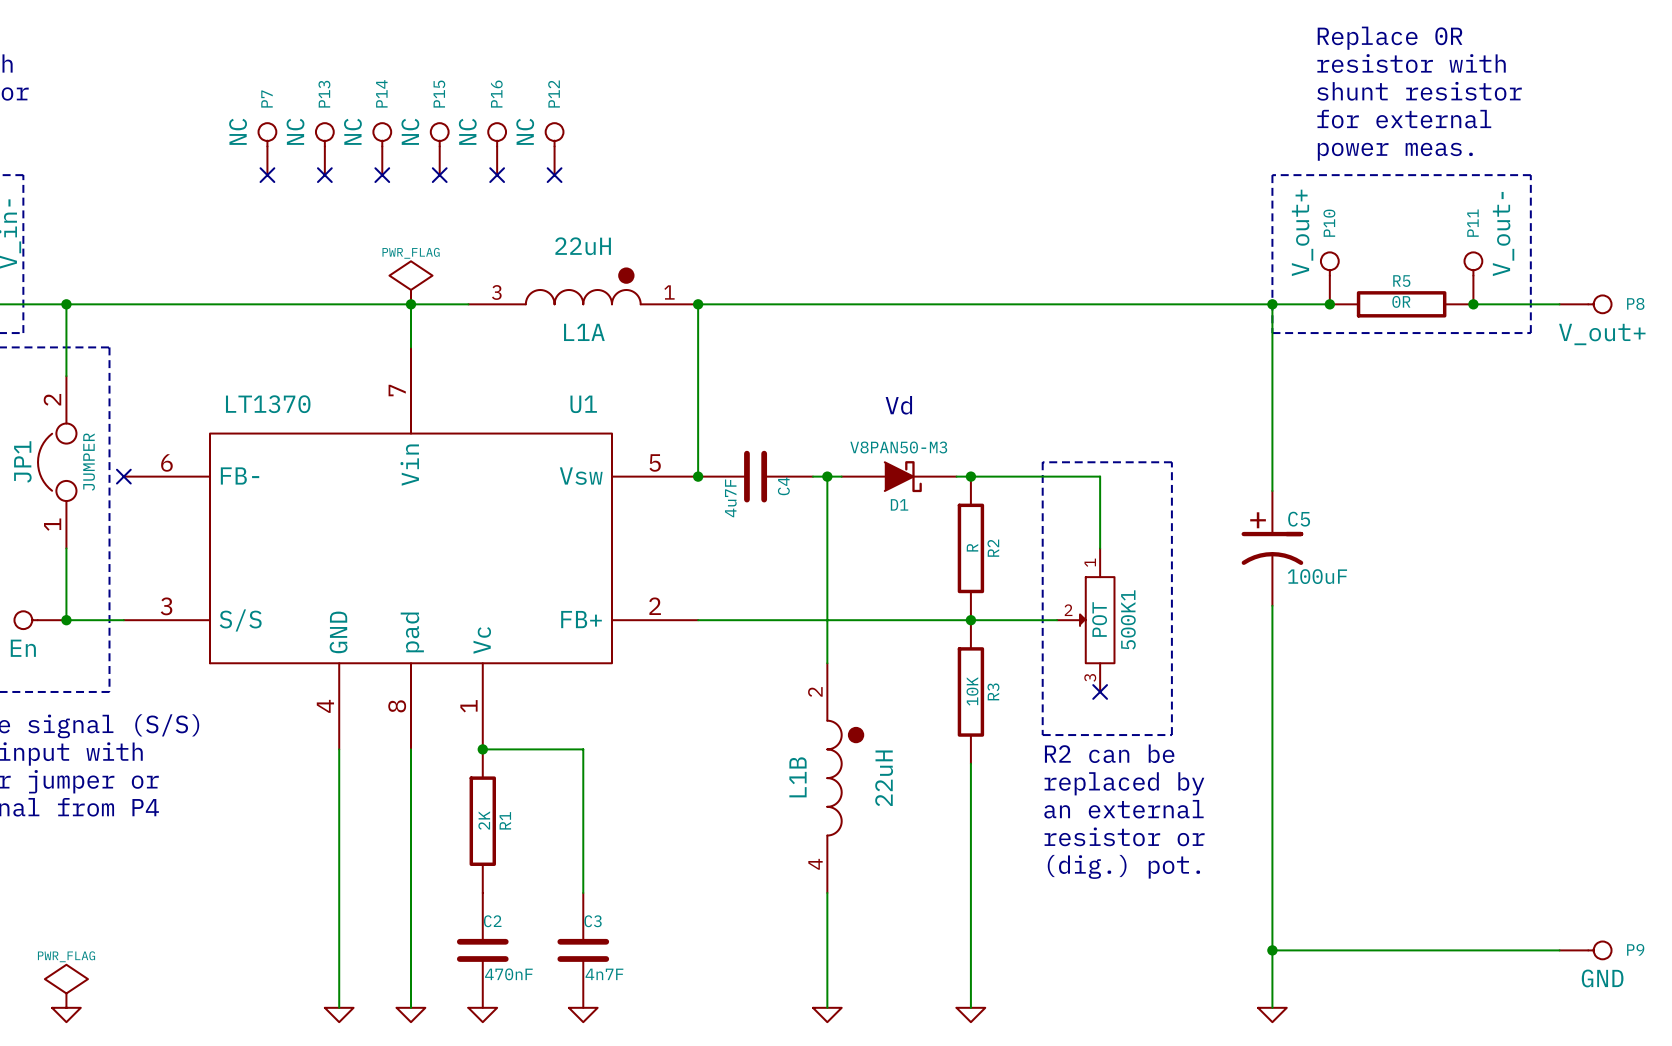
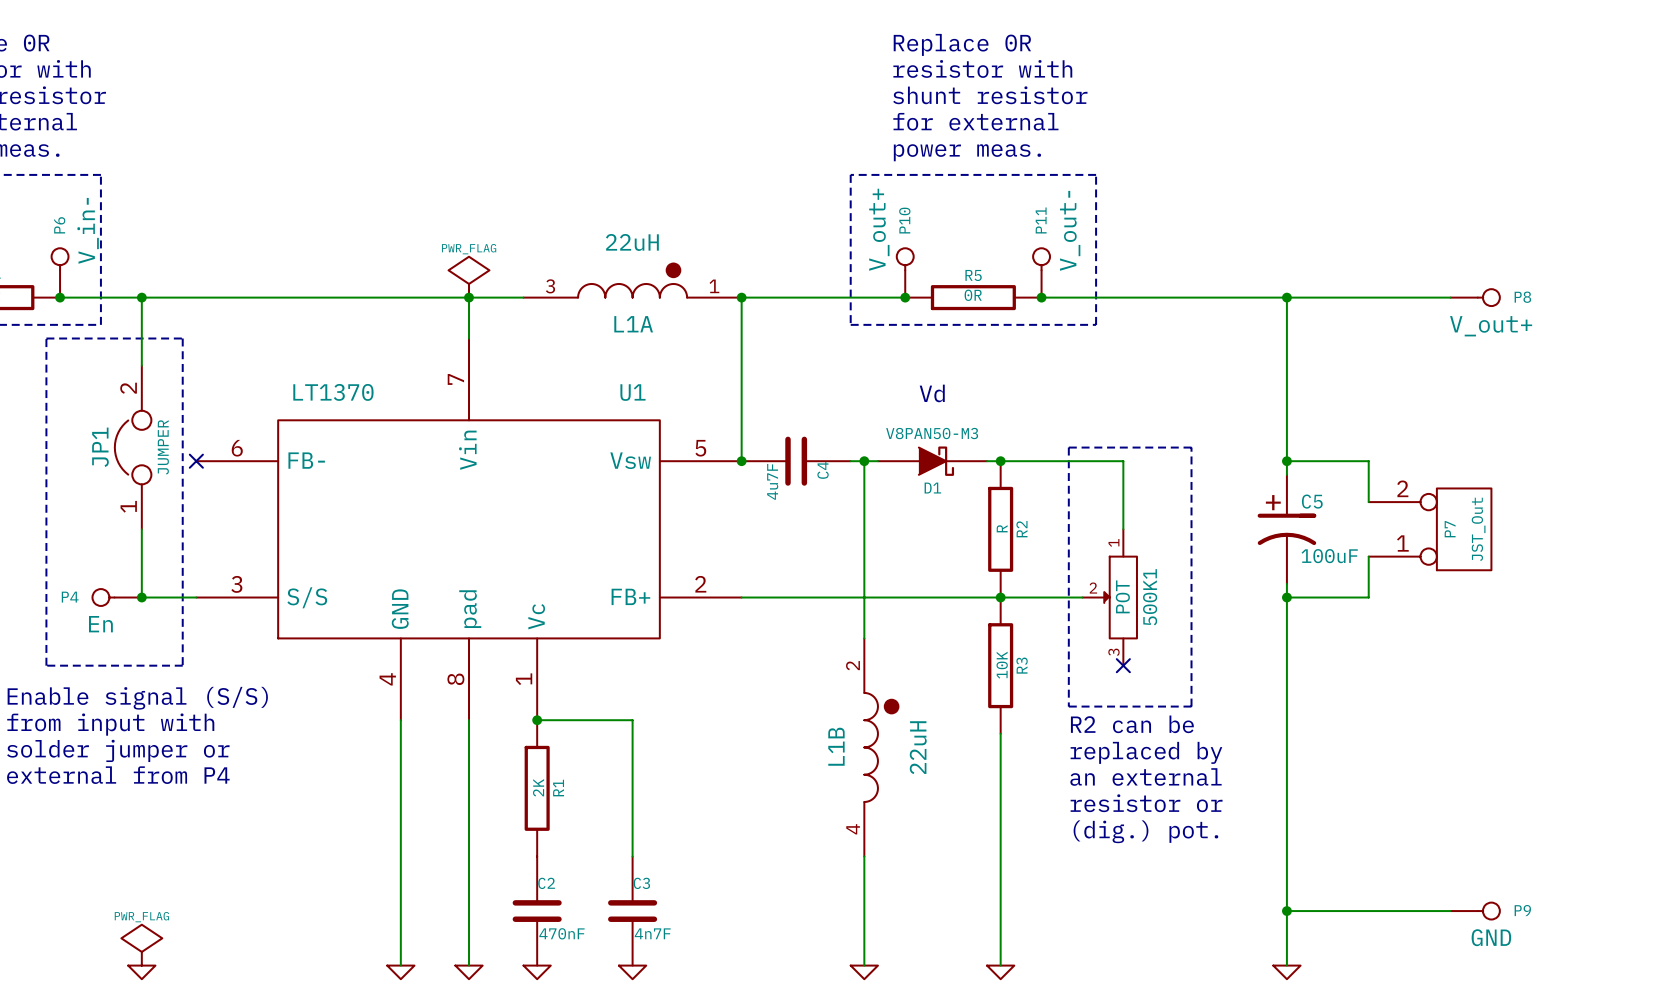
text: none -> Replace 0R (962, 44)
text: Replace 0R (1390, 38) -> none
text: none -> resistor with (982, 68)
text: resistor with (1411, 63) -> none
text: none -> shunt resistor (990, 95)
text: shunt resistor (1419, 91) -> none
P7 name position: P7 (267, 99) -> P7 (1450, 529)
text: none -> for external (975, 121)
text: for external (1404, 119) -> none
P7 symbol: [258, 123, 277, 176] -> [1368, 488, 1492, 571]
P7 value: NC (238, 131) -> JST_Out (1478, 529)
P13: NC (324, 149) -> none
P14: NC (382, 149) -> none
P15: NC (439, 149) -> none
P16: NC (497, 149) -> none
P12: NC (554, 149) -> none
text: none -> power meas. (967, 152)
text: power meas. (1395, 151) -> none
no-connect mark: (267, 175) -> none
no-connect mark: (324, 175) -> none
no-connect mark: (382, 175) -> none
no-connect mark: (439, 175) -> none
no-connect mark: (497, 175) -> none
no-connect mark: (554, 175) -> none
line: none -> (850, 174) (850, 324) (1096, 324) (1096, 174) (850, 174)
line: (1272, 175) (1272, 333) (1530, 333) (1530, 175) (1272, 175) -> none
P10 position: (1329, 278) -> (905, 272)
P11 position: (1473, 278) -> (1041, 272)
wire: (870, 304) (1013, 304) -> none
junction: none -> (905, 297)
junction: none -> (1041, 297)
wire: none -> (1341, 297) (1450, 297)
junction: (1329, 304) -> none
R5 position: (1401, 304) -> (973, 297)
wire: (1473, 304) (1559, 304) -> none
junction: (1473, 304) -> none
P8 position: (1585, 304) -> (1475, 297)
wire: none -> (1286, 461) (1368, 461) (1368, 502)
junction: none -> (1286, 461)
wire: none -> (1368, 556) (1368, 597) (1286, 597)
junction: none -> (1286, 597)
wire: (1444, 950) (1559, 950) -> none
P9 position: (1585, 950) -> (1475, 911)

